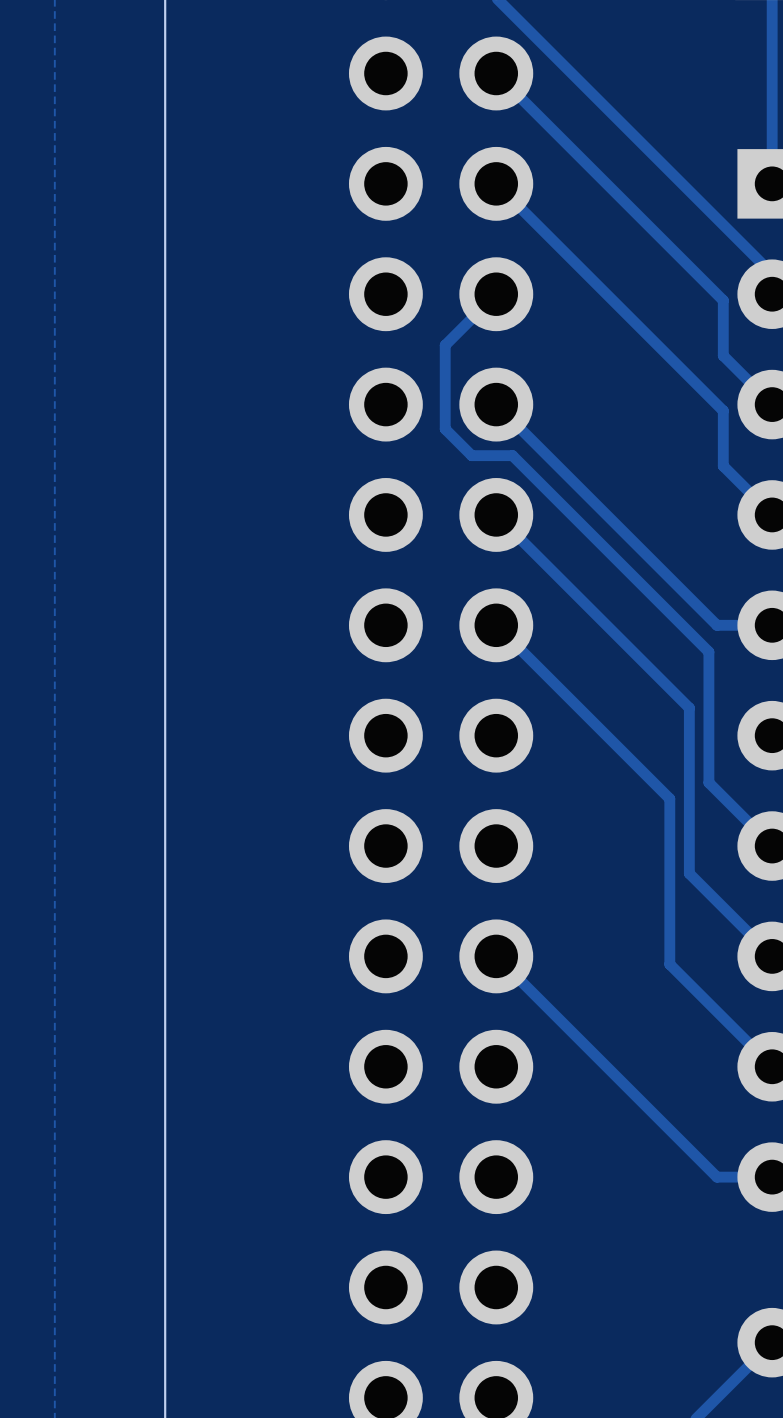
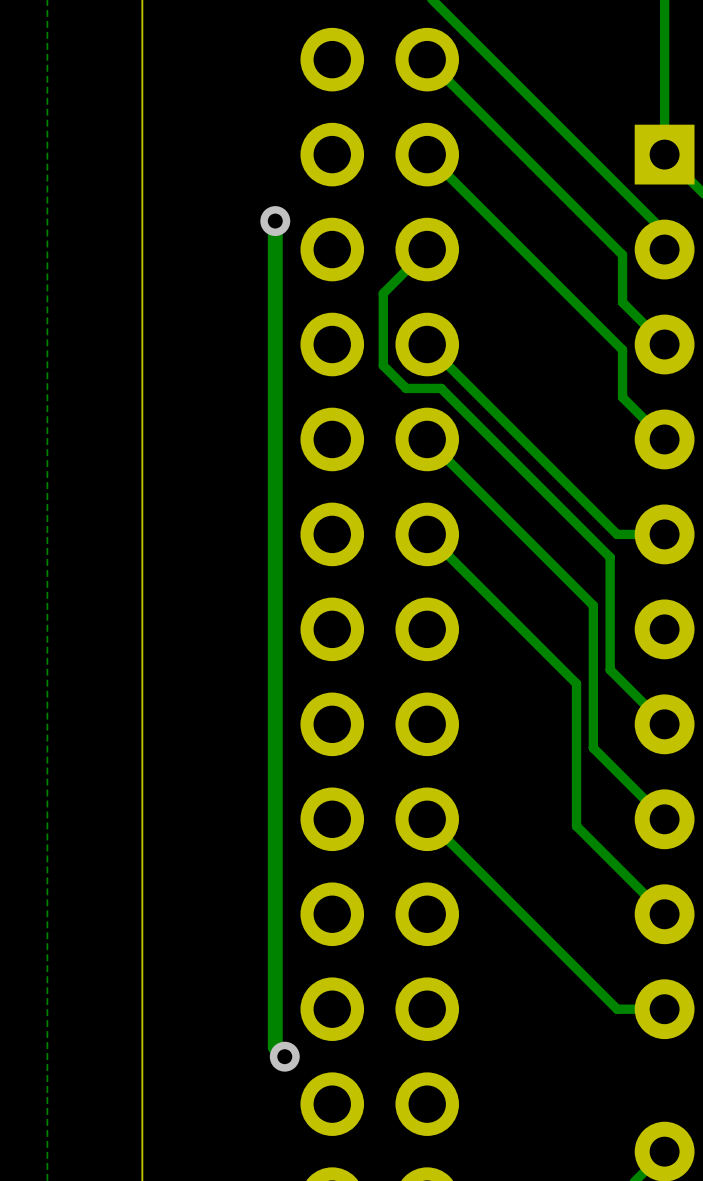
track: none -> (275, 221) (275, 1047) (284, 1056)
via: none -> (275, 221)
via: none -> (284, 1056)

